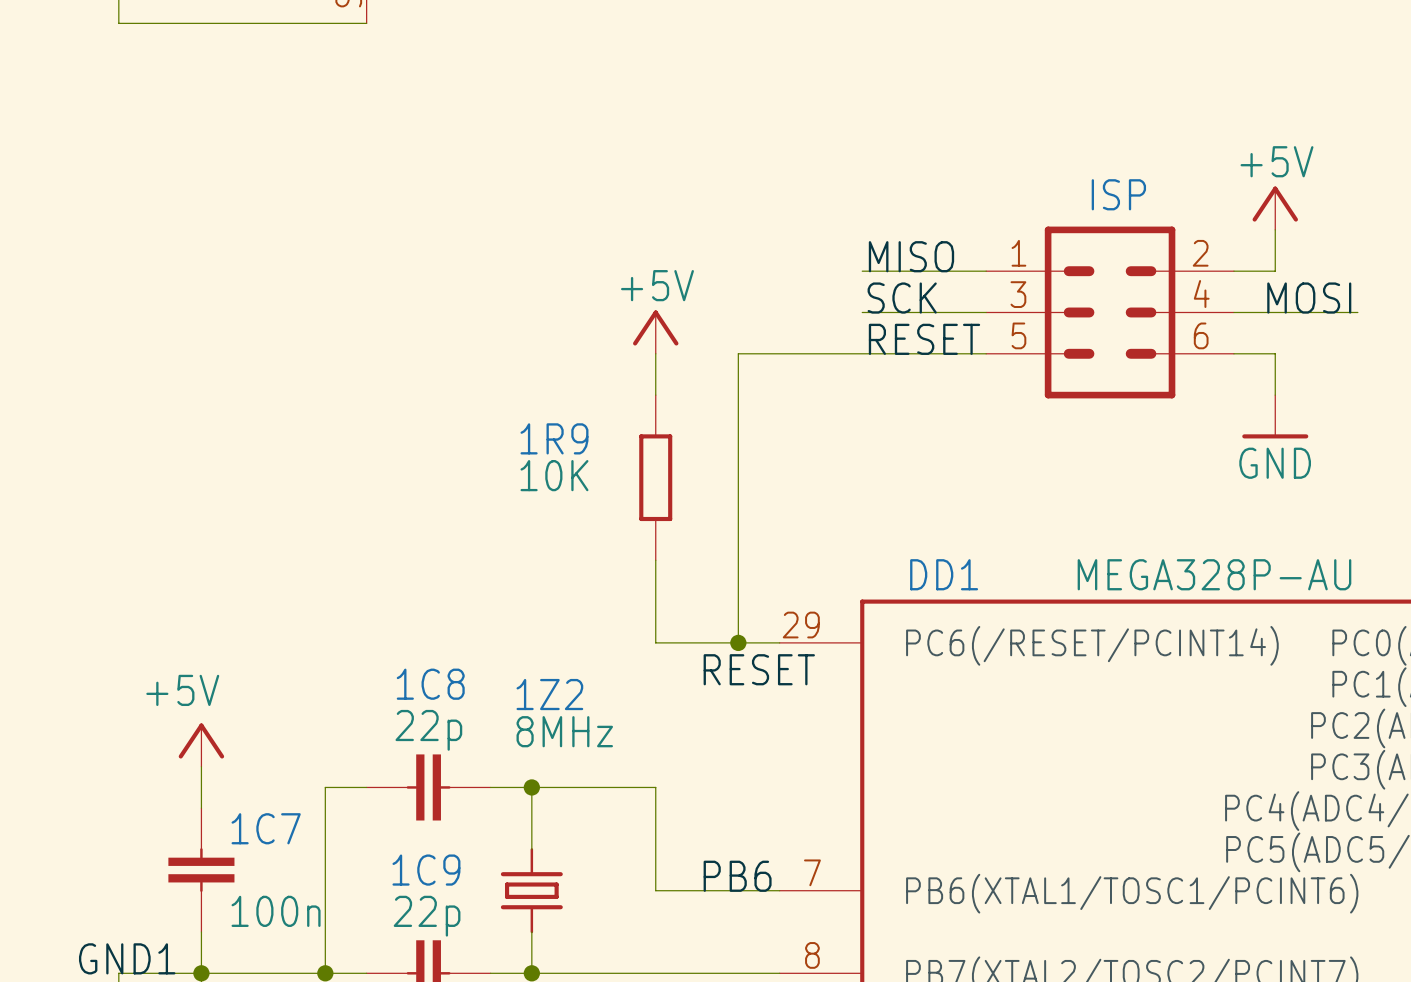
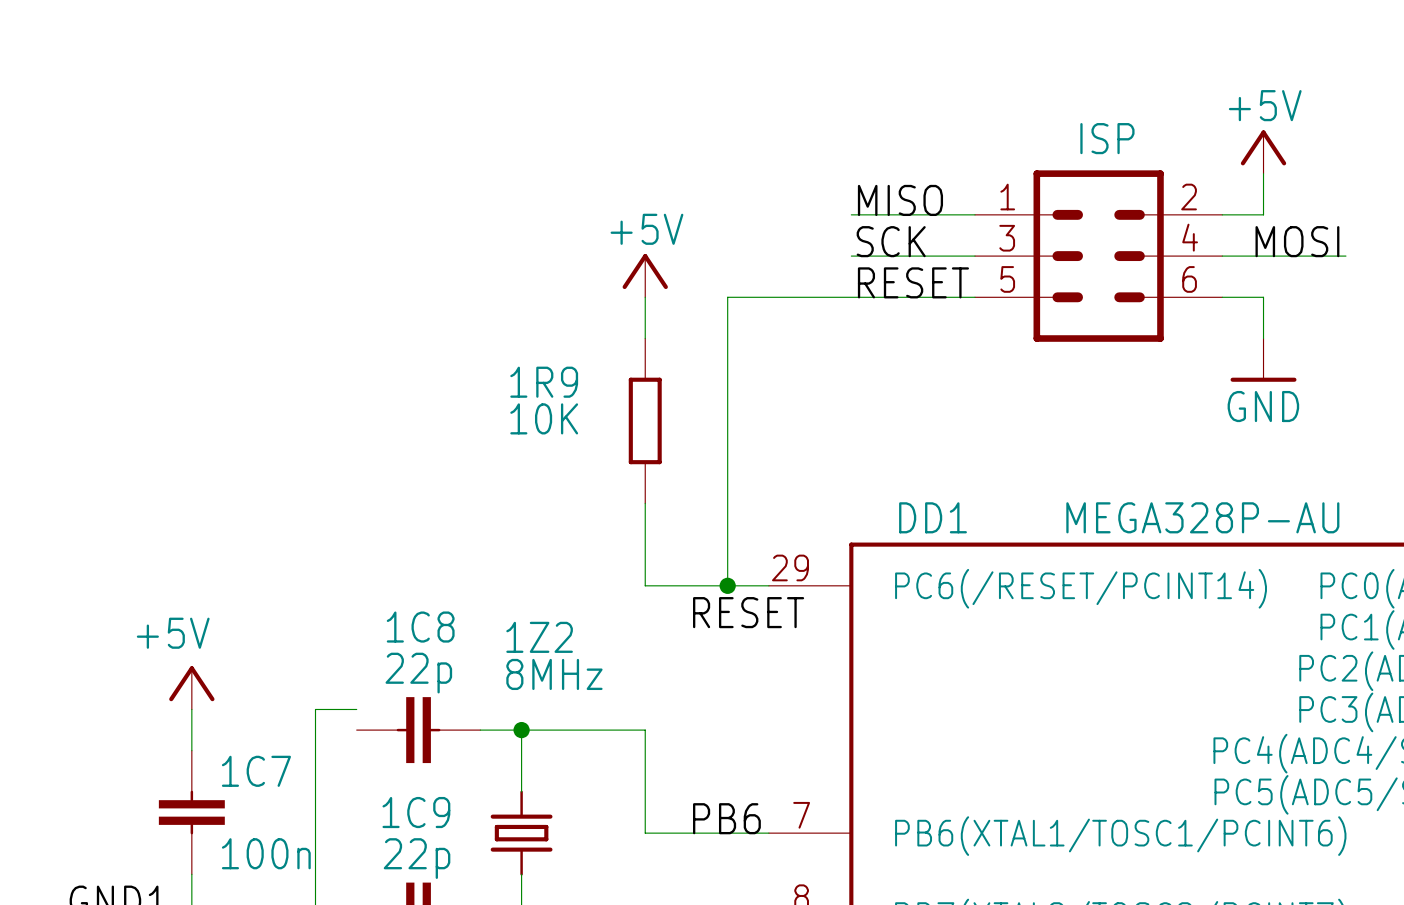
wire: (325, 787) (366, 787) -> (315, 730) (315, 709) (356, 709)

